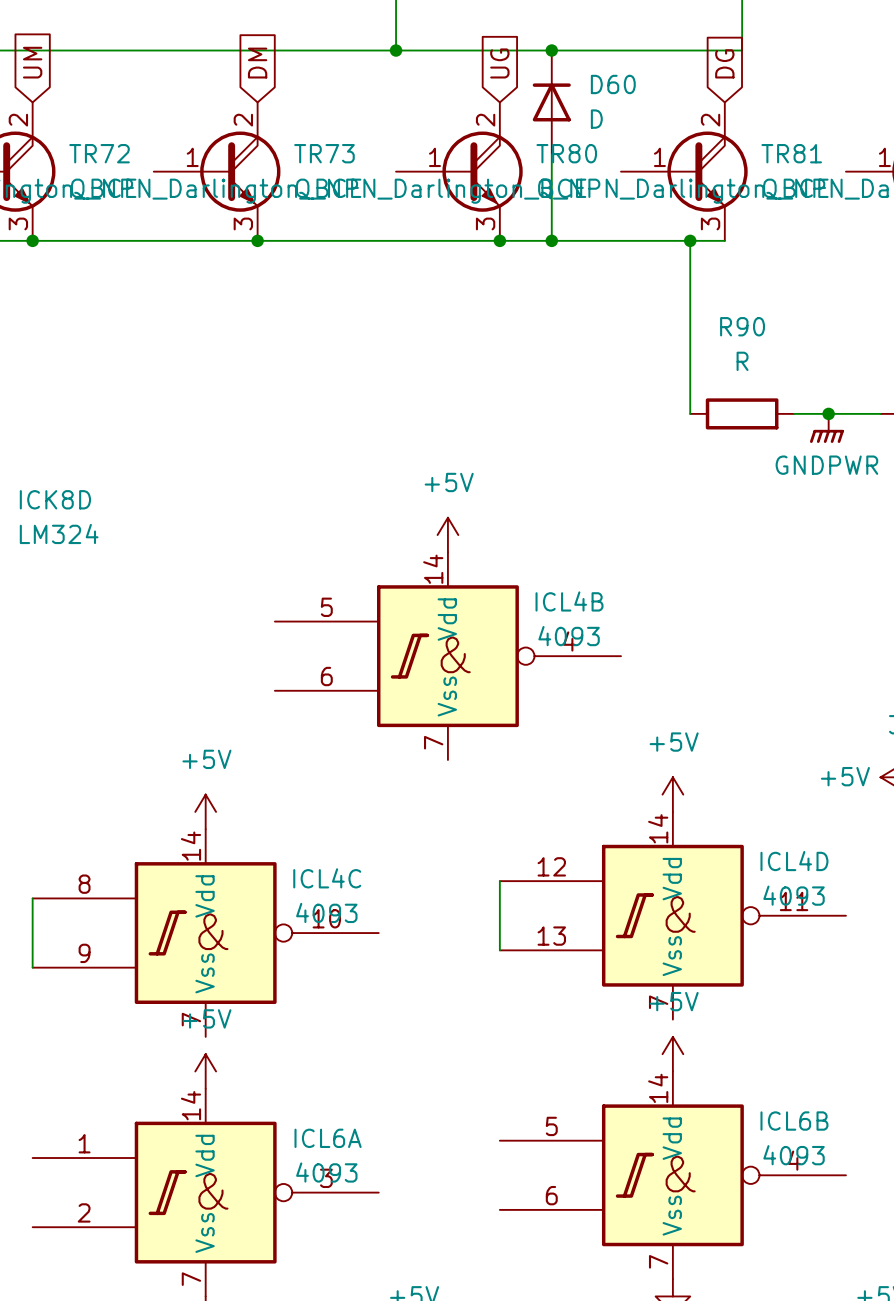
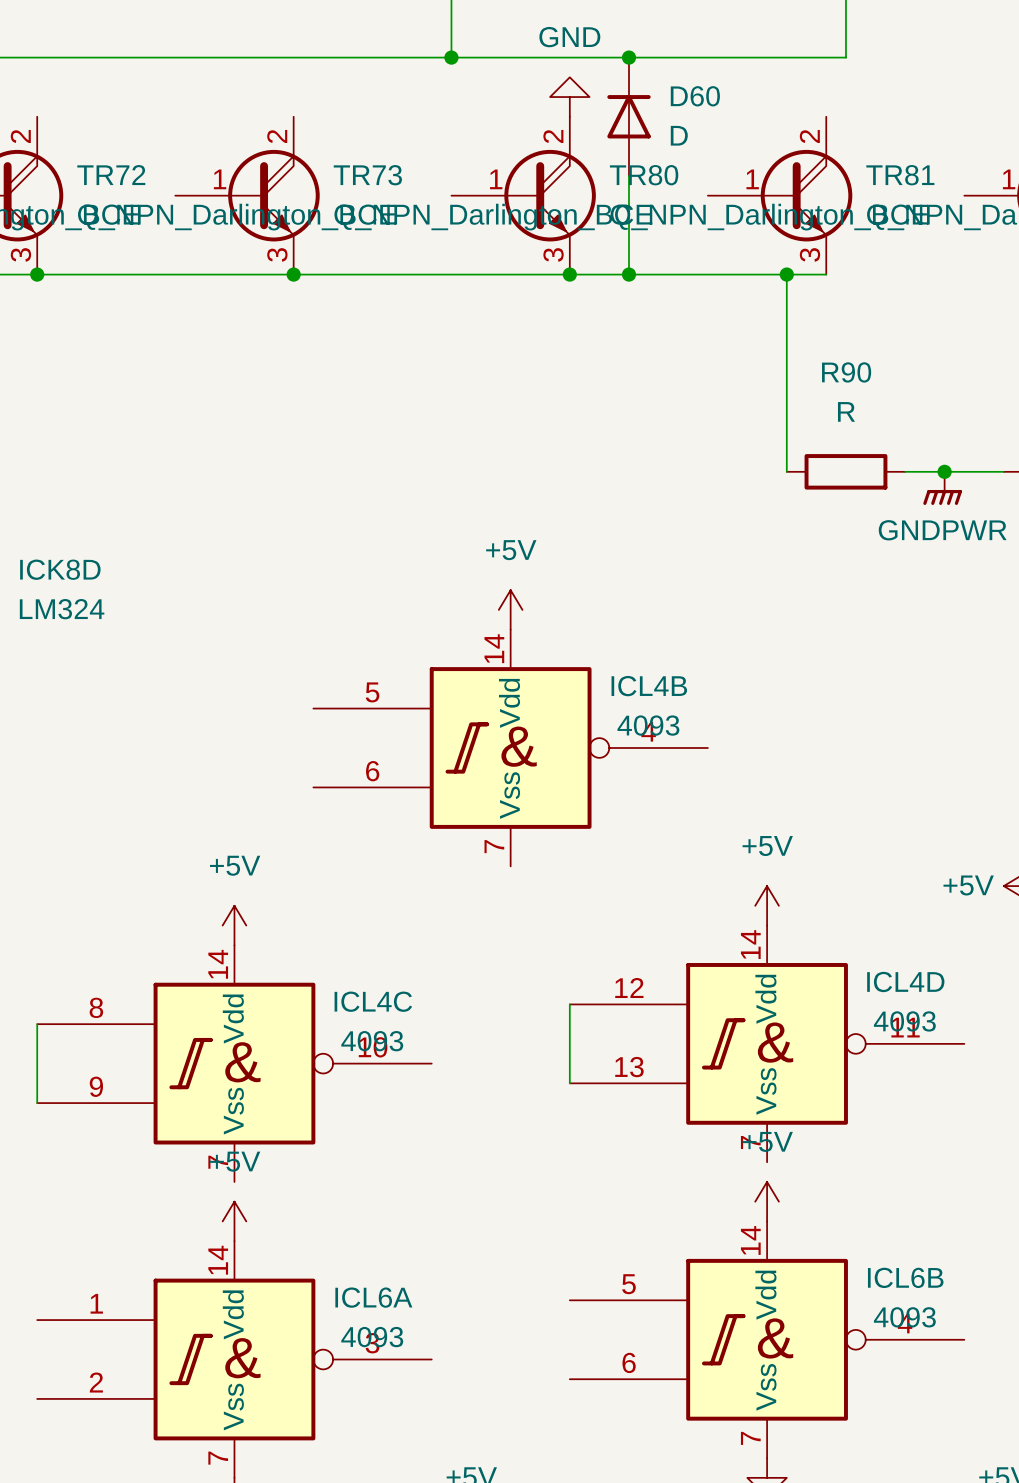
global label: UM (32, 62) -> none
global label: DM (257, 63) -> none
global label: UG (499, 63) -> none
global label: DG (724, 63) -> none
power symbol: none -> GND (569, 97)

